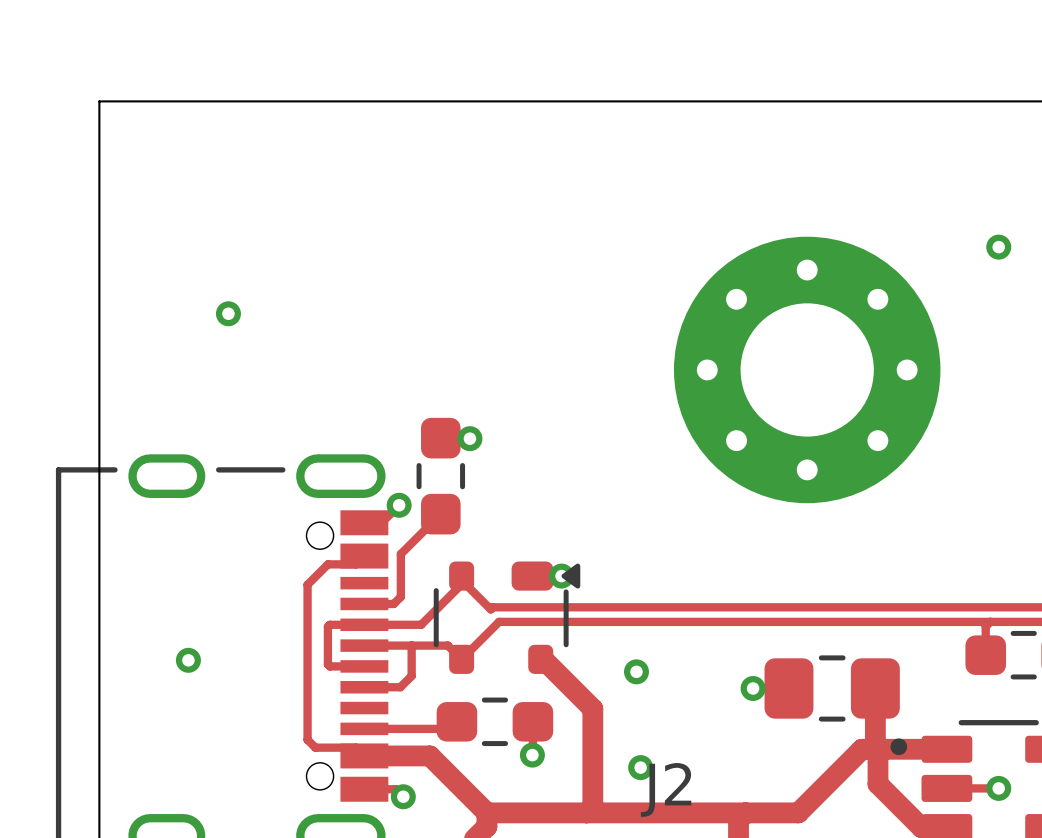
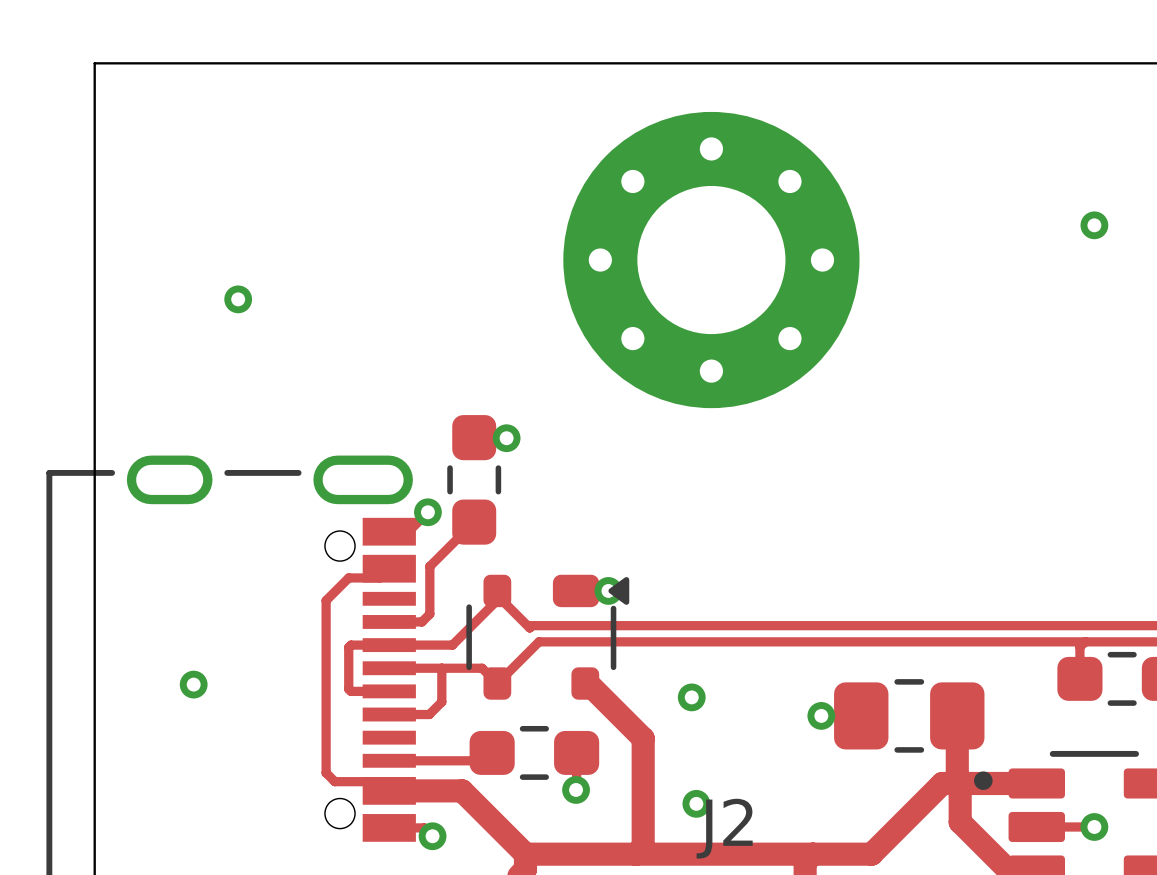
part position: (807, 369) -> (711, 260)

